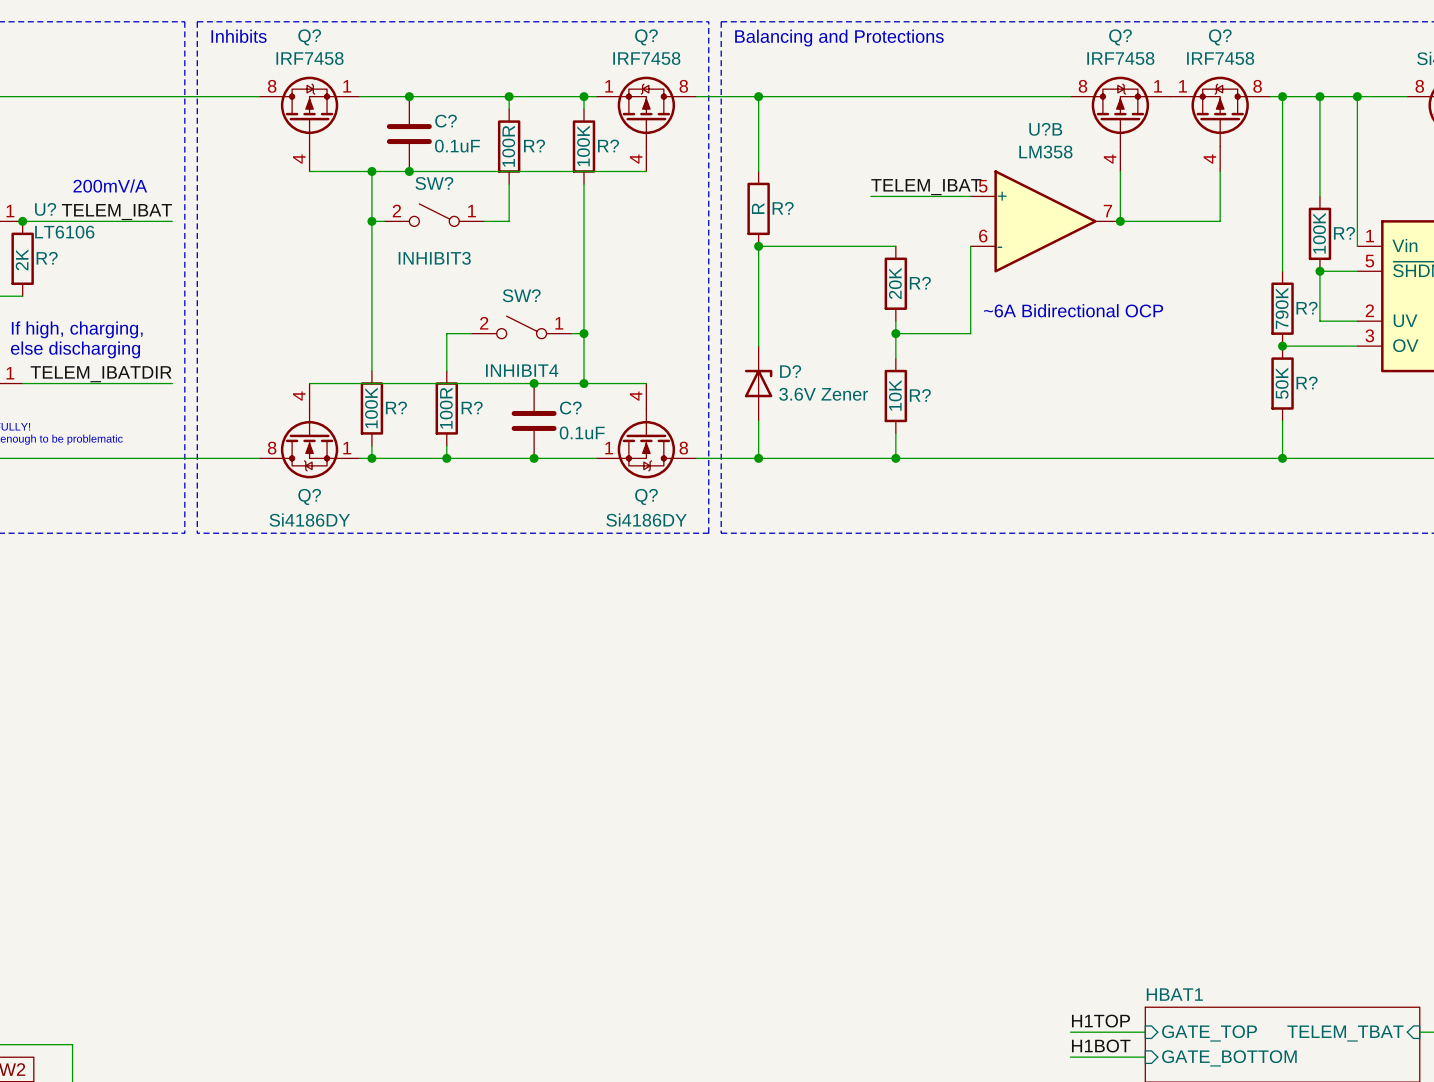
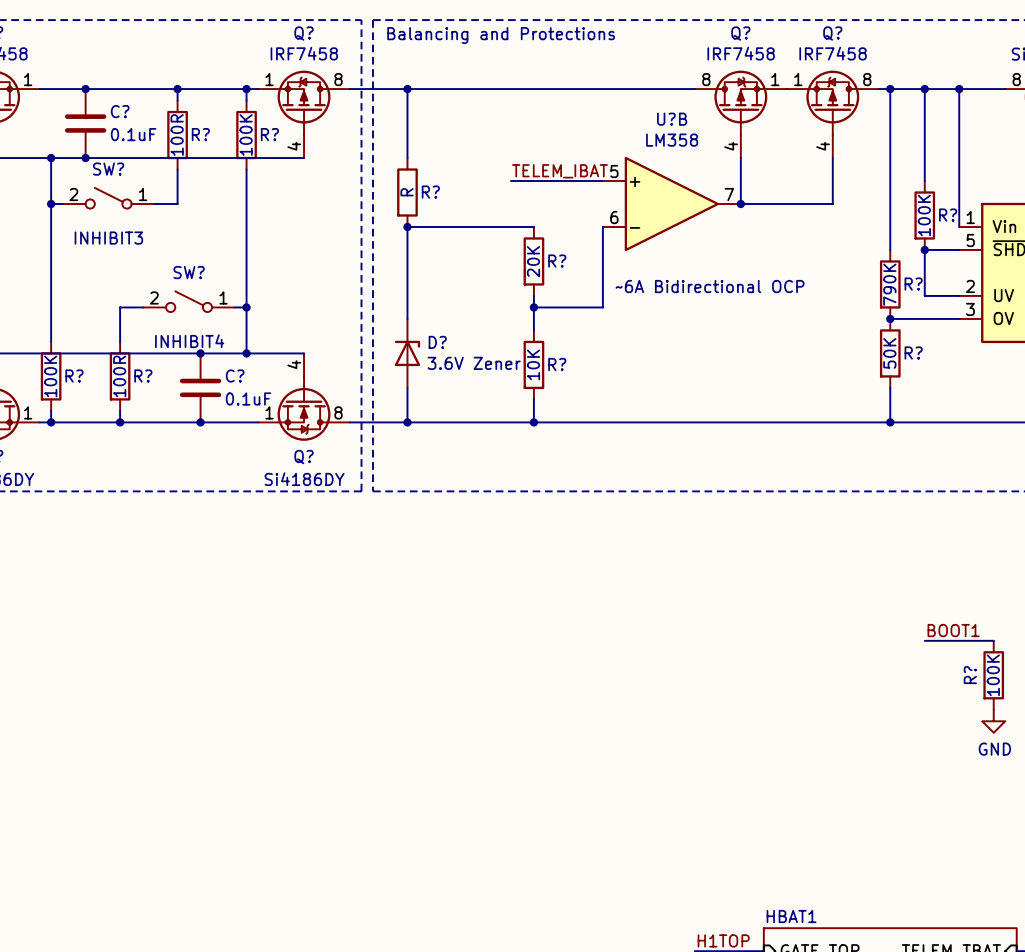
label: none -> BOOT1 (953, 630)
wire: none -> (924, 640) (993, 640)
R?: none -> 100K (993, 675)
power symbol: none -> GND (993, 721)

